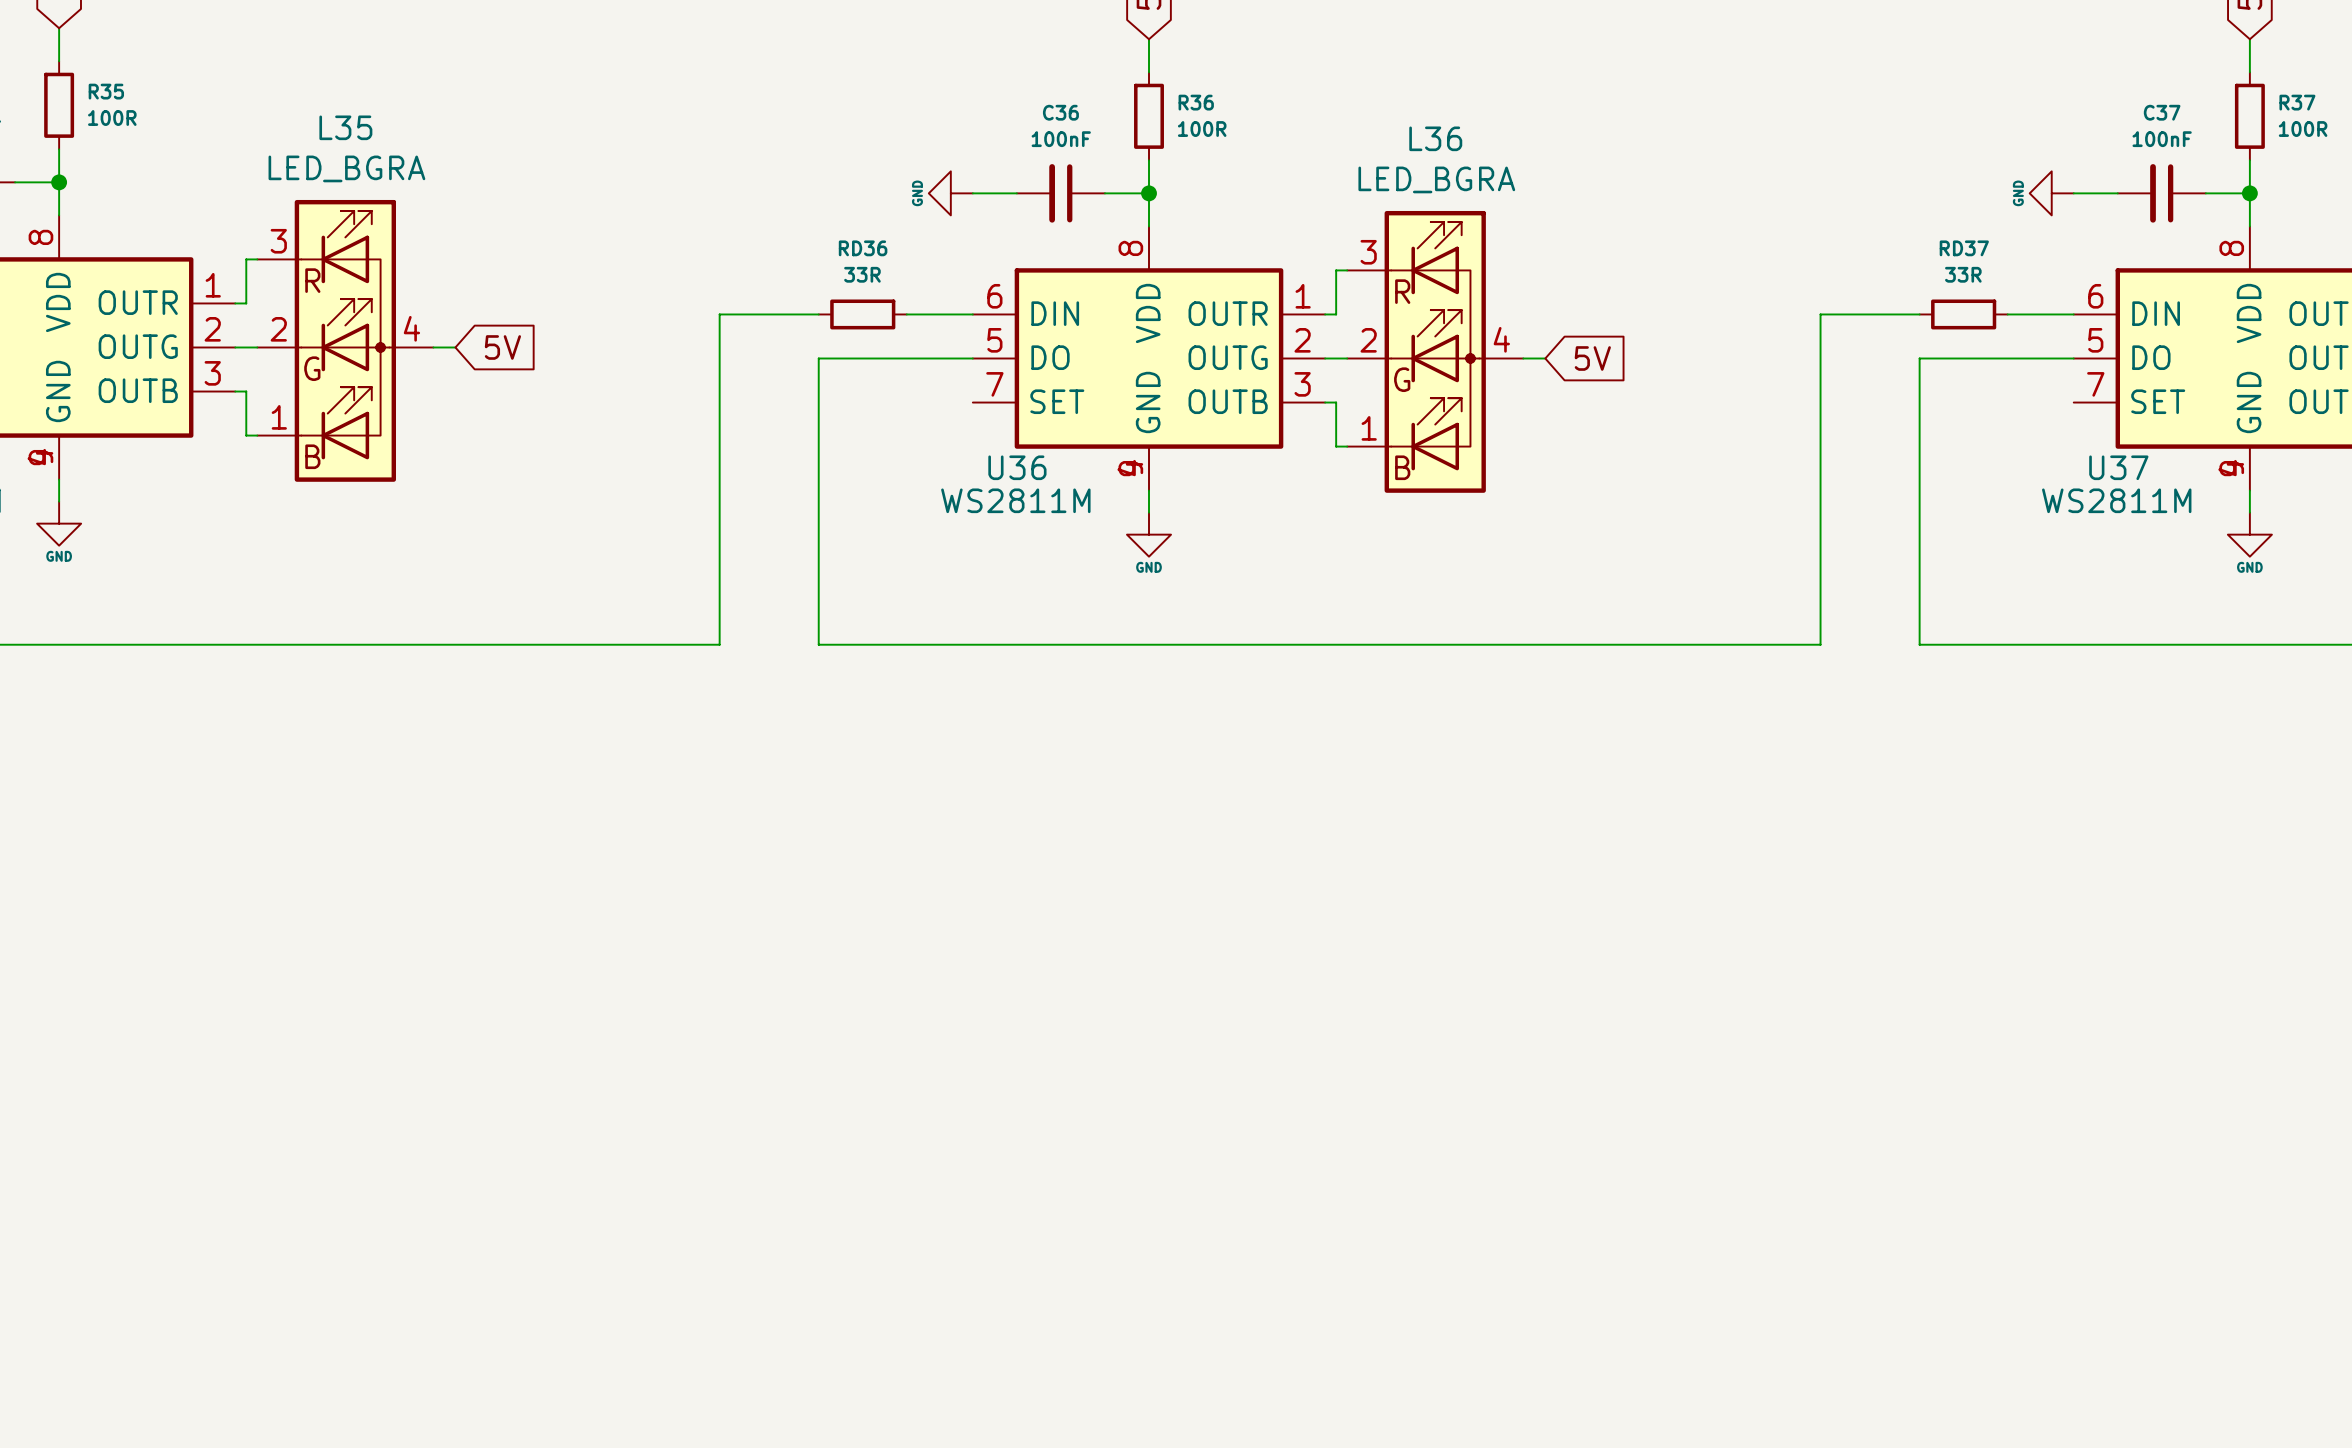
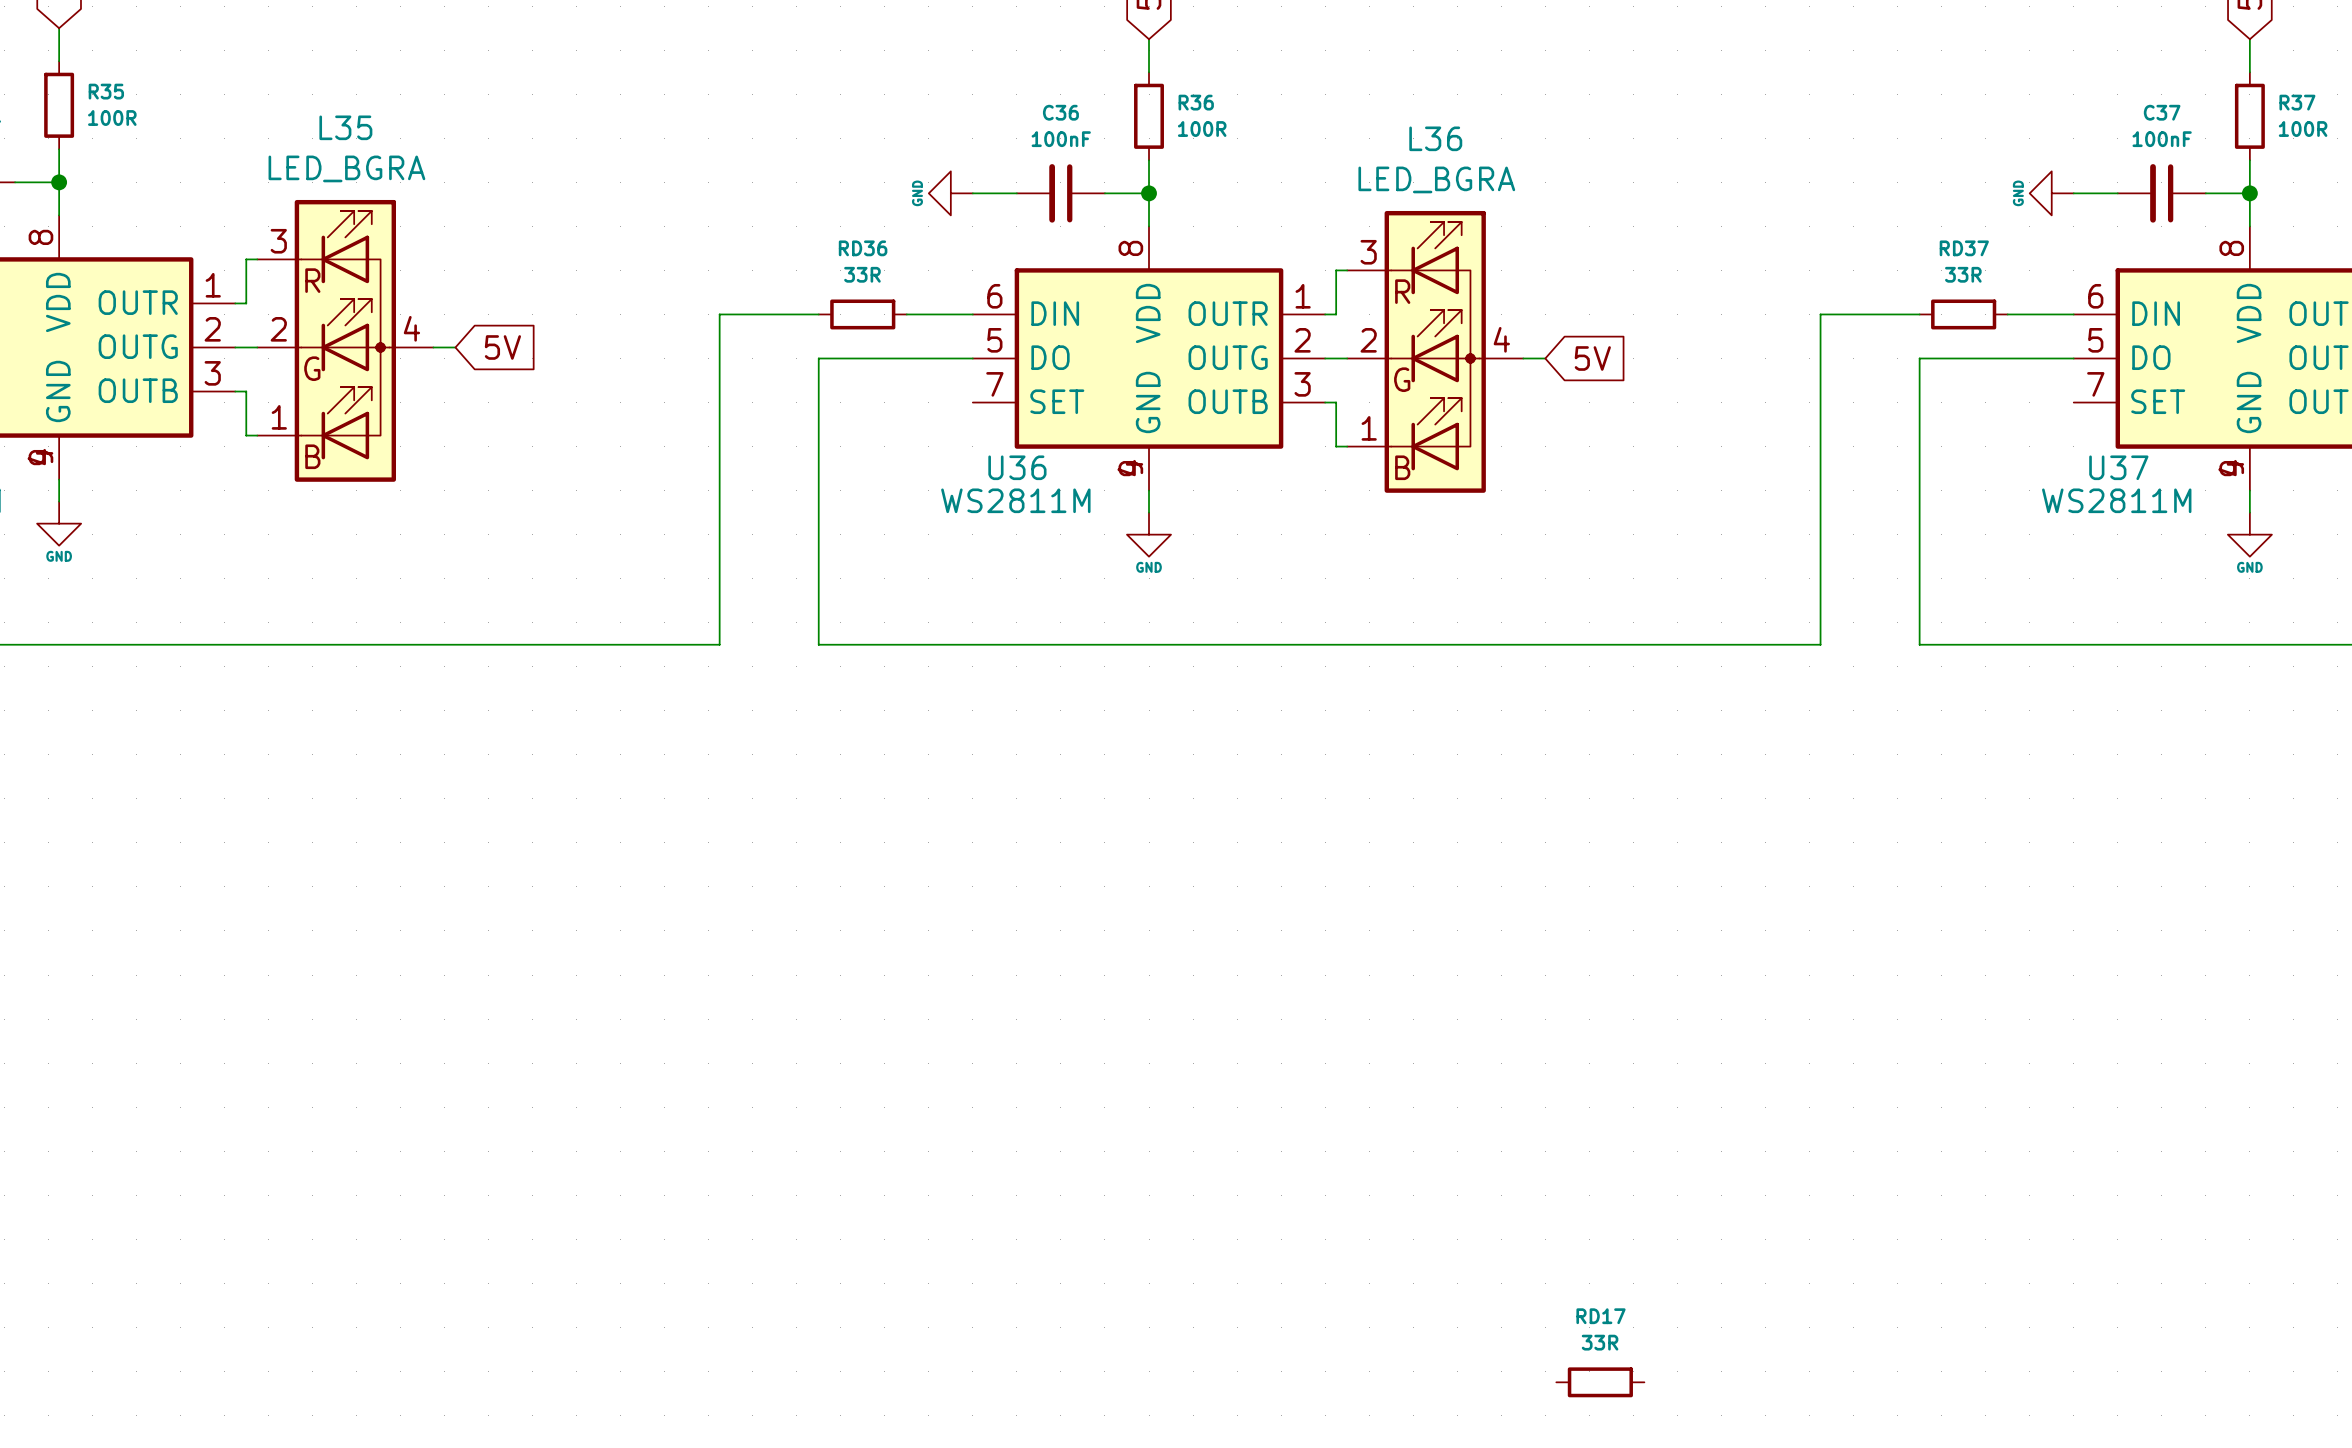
RD17: none -> 33R (1600, 1382)

